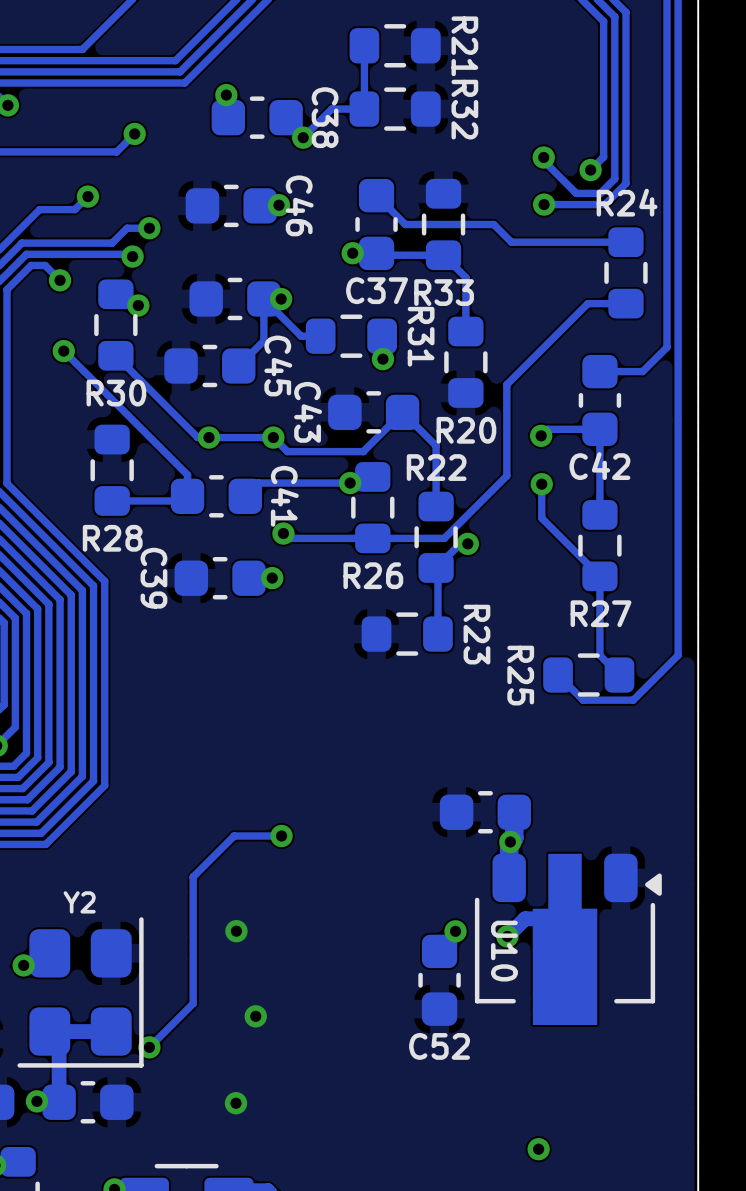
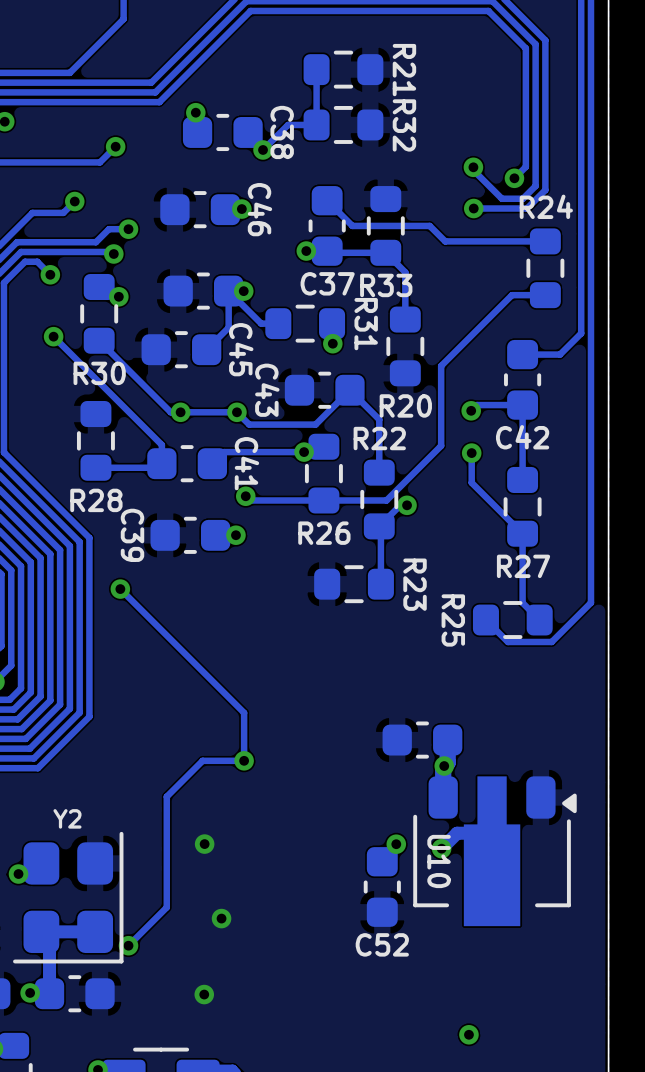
track: none -> (120, 589) (244, 712) (244, 760)
via: none -> (120, 589)

